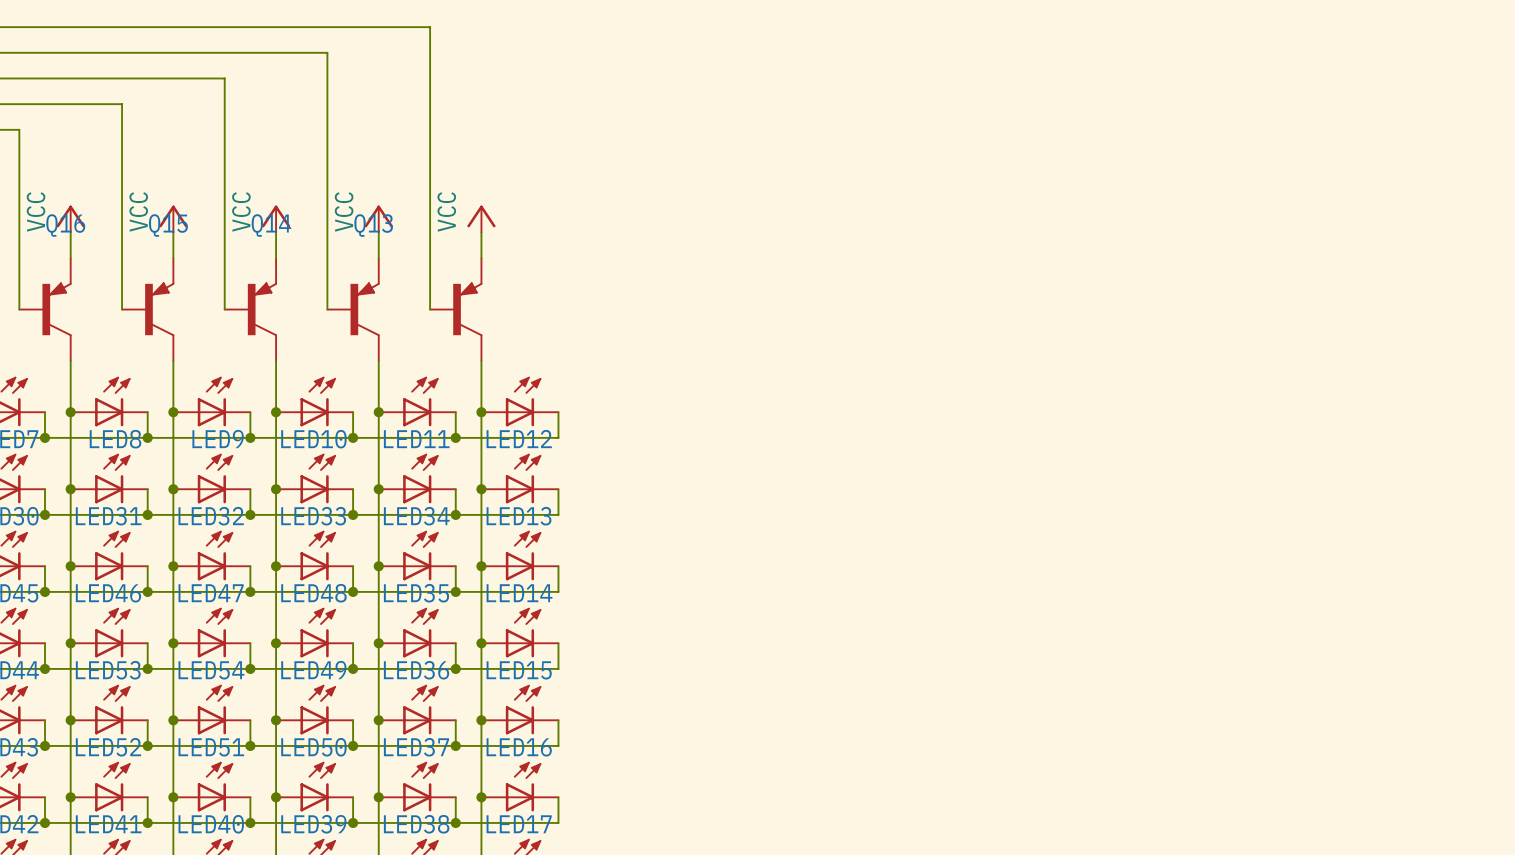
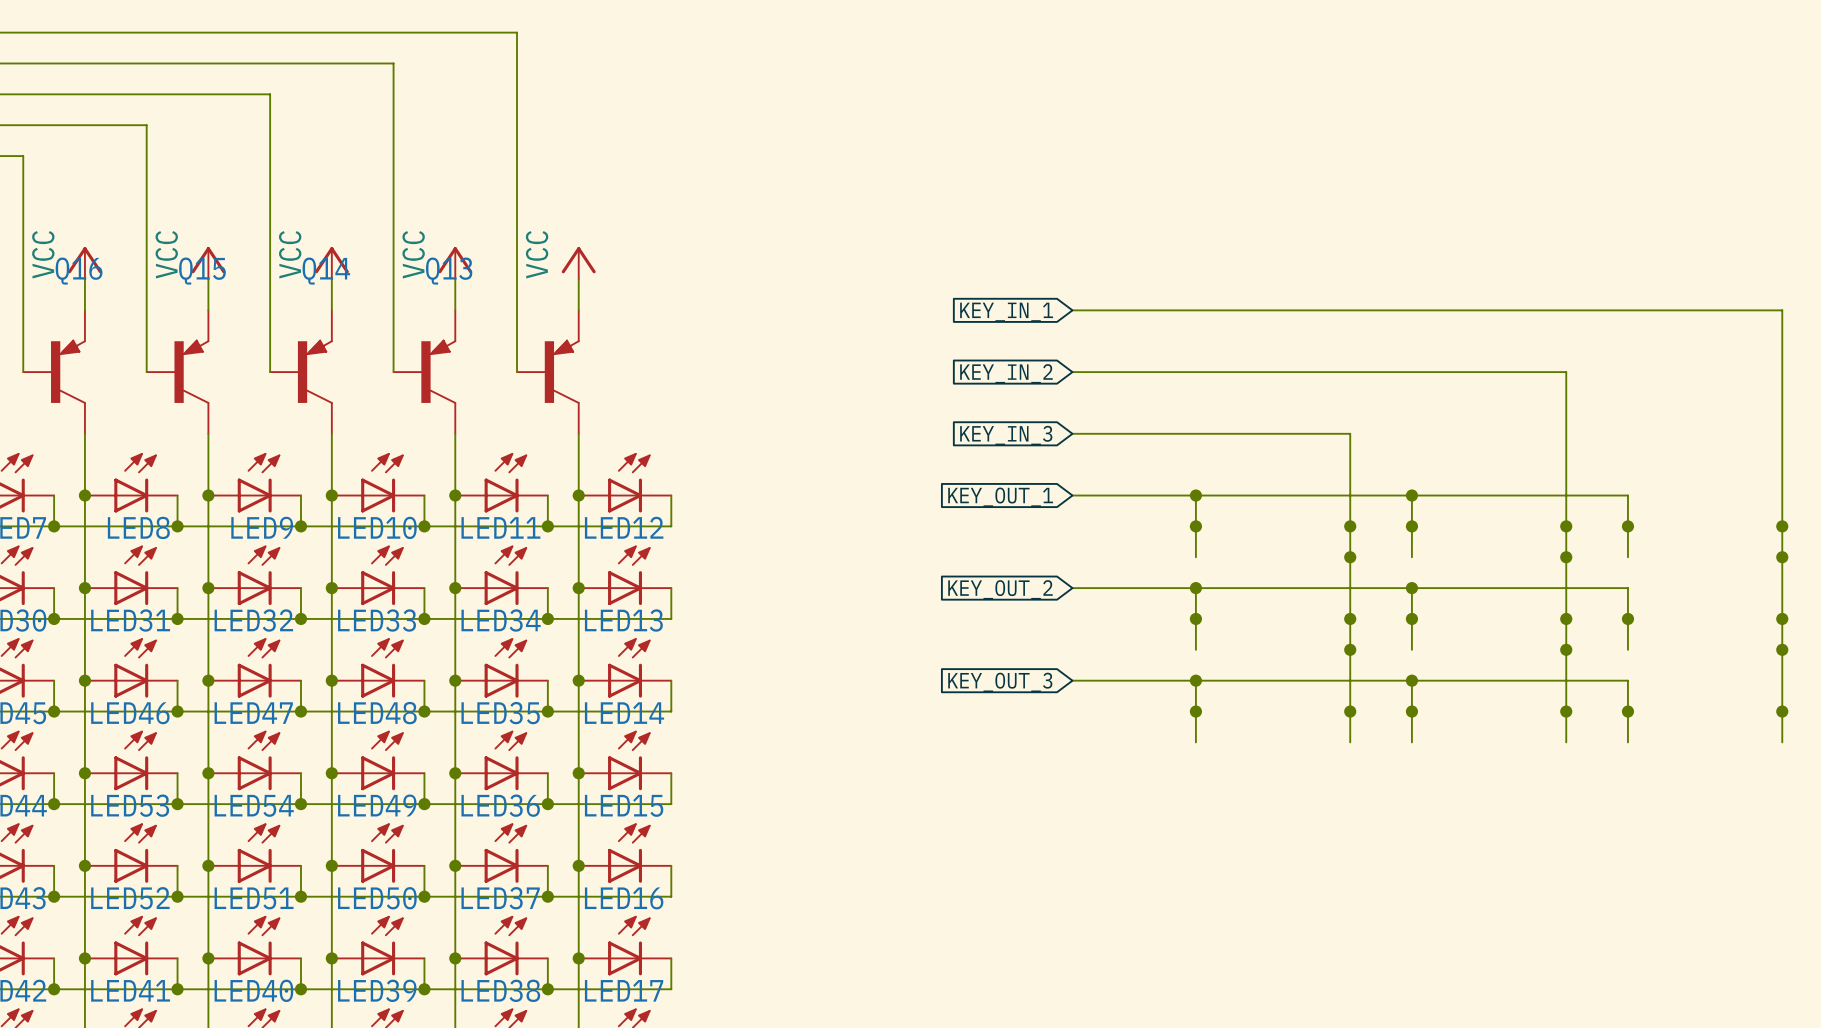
wire: none -> (1072, 310) (1782, 310) (1782, 742)
global label: none -> KEY_IN_1 (1006, 312)
wire: none -> (1072, 372) (1566, 372) (1566, 742)
global label: none -> KEY_IN_2 (1006, 373)
wire: none -> (1072, 433) (1350, 433) (1350, 742)
global label: none -> KEY_IN_3 (1006, 435)
wire: none -> (1072, 495) (1627, 495) (1627, 557)
wire: none -> (1195, 495) (1195, 557)
junction: none -> (1195, 495)
wire: none -> (1411, 495) (1411, 557)
junction: none -> (1411, 495)
global label: none -> KEY_OUT_1 (1000, 497)
junction: none -> (1195, 526)
junction: none -> (1350, 526)
junction: none -> (1411, 526)
junction: none -> (1566, 526)
junction: none -> (1627, 526)
junction: none -> (1782, 526)
junction: none -> (1350, 557)
junction: none -> (1566, 557)
junction: none -> (1782, 557)
wire: none -> (1072, 588) (1627, 588) (1627, 649)
wire: none -> (1195, 588) (1195, 649)
junction: none -> (1195, 588)
wire: none -> (1411, 588) (1411, 649)
junction: none -> (1411, 588)
global label: none -> KEY_OUT_2 (1000, 589)
junction: none -> (1195, 618)
junction: none -> (1350, 618)
junction: none -> (1411, 618)
junction: none -> (1566, 618)
junction: none -> (1627, 618)
junction: none -> (1782, 618)
junction: none -> (1350, 649)
junction: none -> (1566, 649)
junction: none -> (1782, 649)
wire: none -> (1072, 680) (1627, 680) (1627, 742)
wire: none -> (1195, 680) (1195, 742)
junction: none -> (1195, 680)
wire: none -> (1411, 680) (1411, 742)
junction: none -> (1411, 680)
global label: none -> KEY_OUT_3 (1000, 682)
junction: none -> (1195, 711)
junction: none -> (1350, 711)
junction: none -> (1411, 711)
junction: none -> (1566, 711)
junction: none -> (1627, 711)
junction: none -> (1782, 711)

